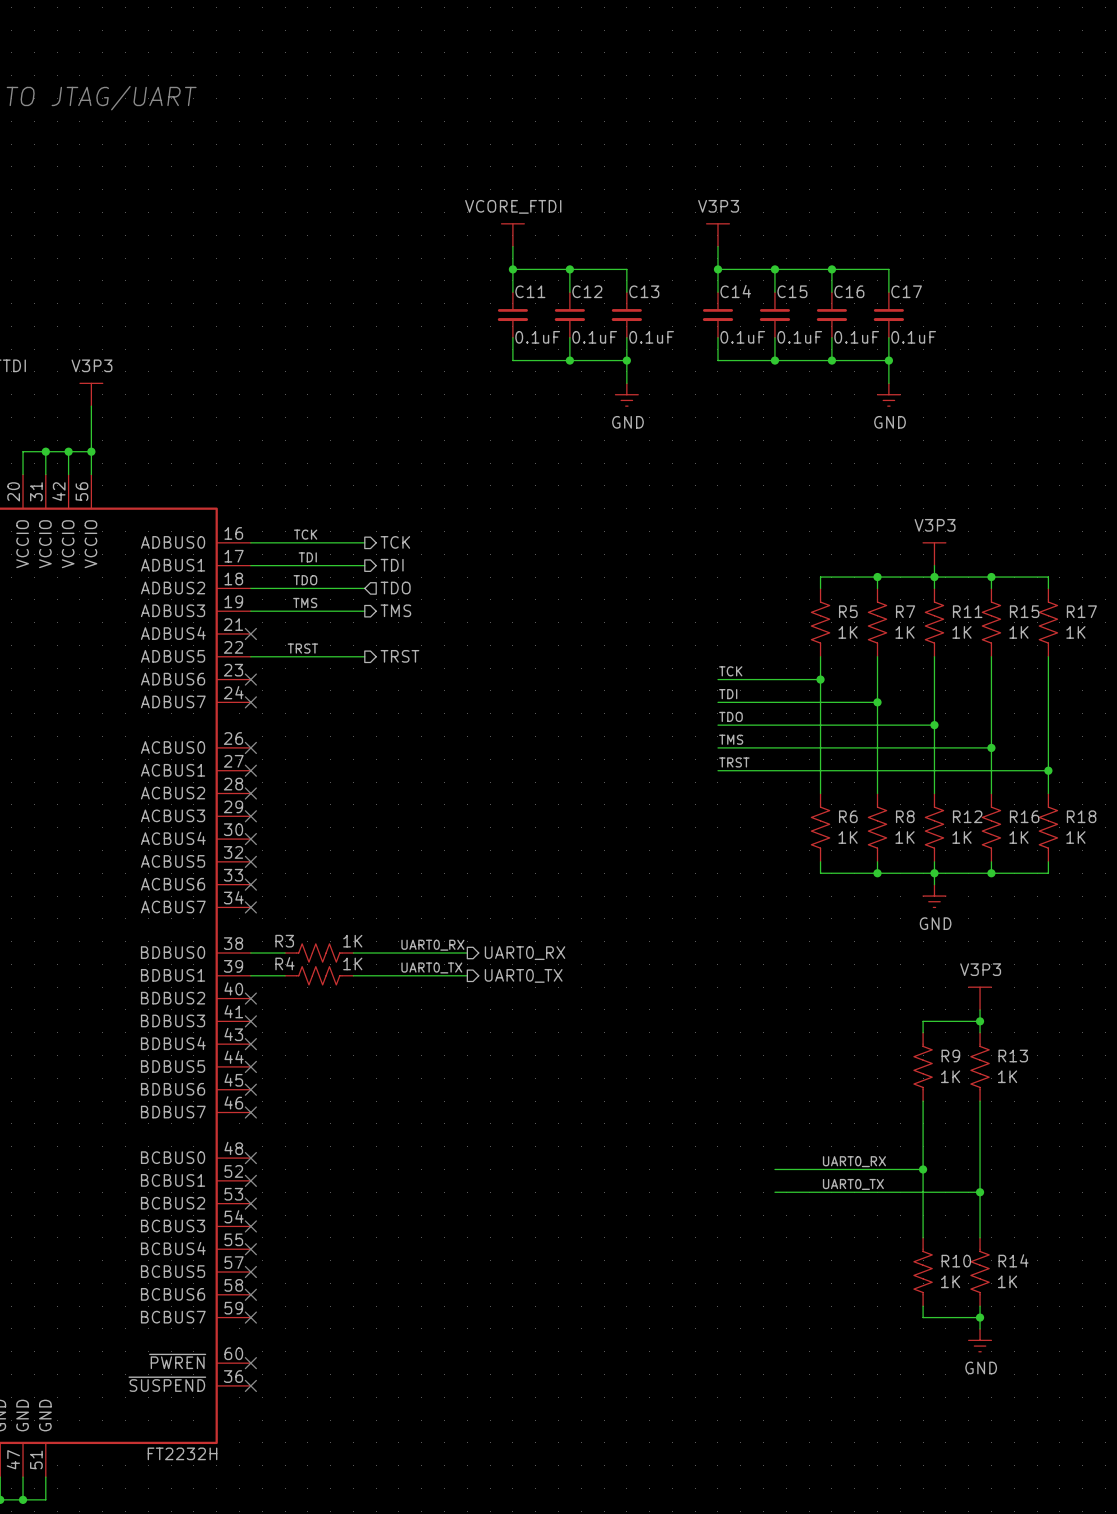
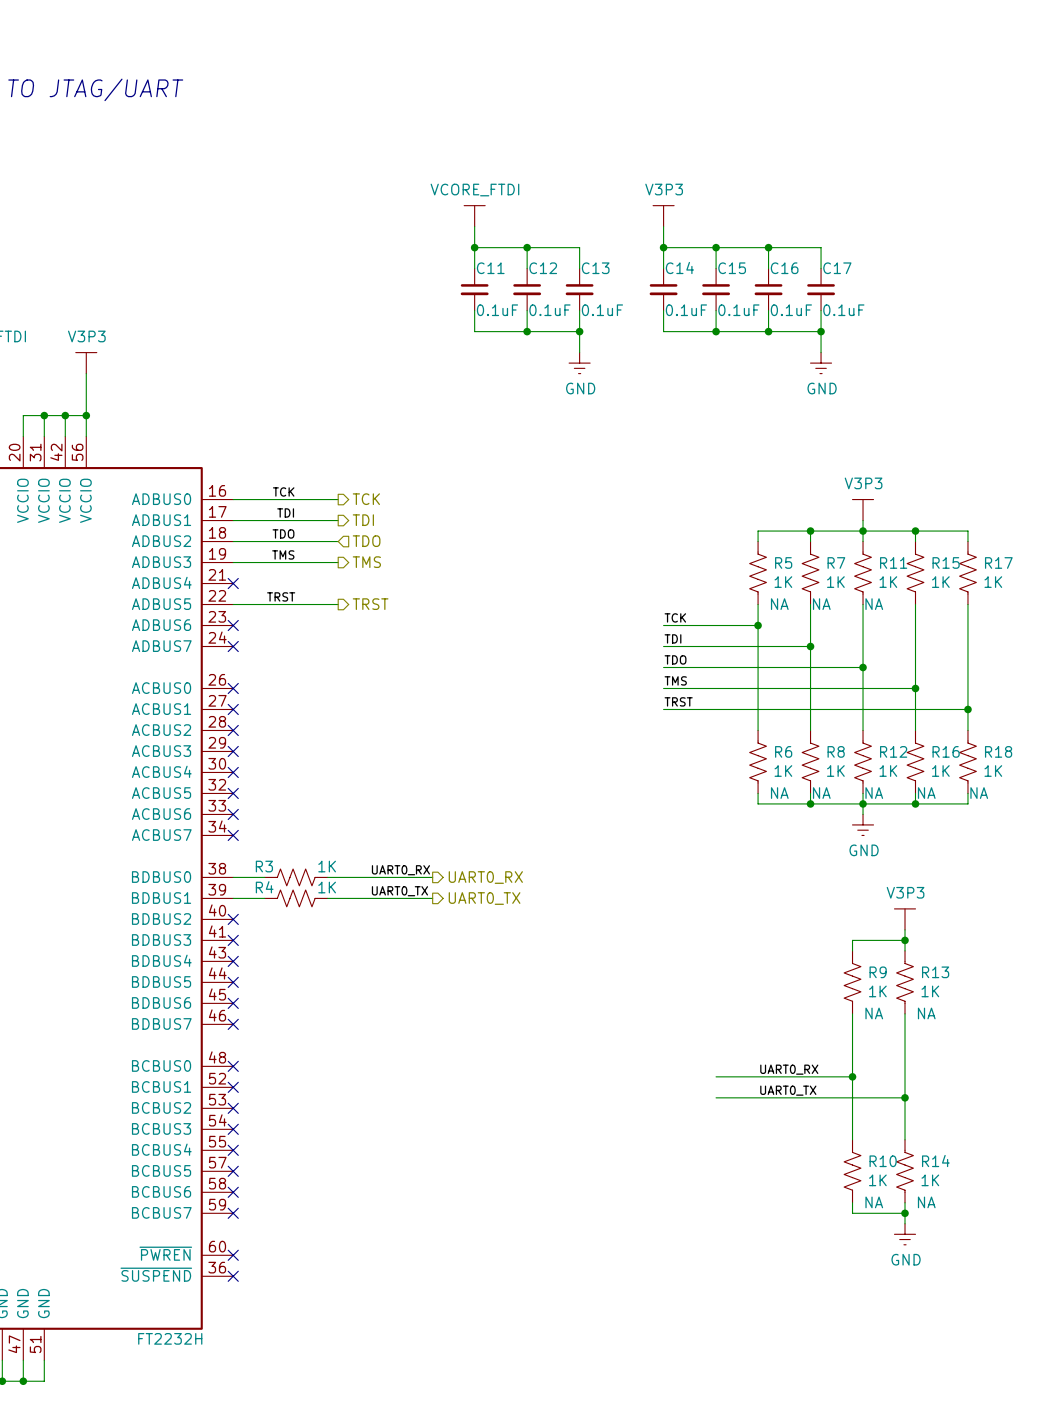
R5 text: none -> NA (779, 604)
R7 text: none -> NA (821, 604)
R11 text: none -> NA (874, 604)
R6 text: none -> NA (779, 793)
R8 text: none -> NA (821, 793)
R12 text: none -> NA (874, 793)
R16 text: none -> NA (926, 793)
R18 text: none -> NA (979, 793)
R9 text: none -> NA (874, 1013)
R13 text: none -> NA (926, 1013)
R10 text: none -> NA (874, 1202)
R14 text: none -> NA (926, 1202)

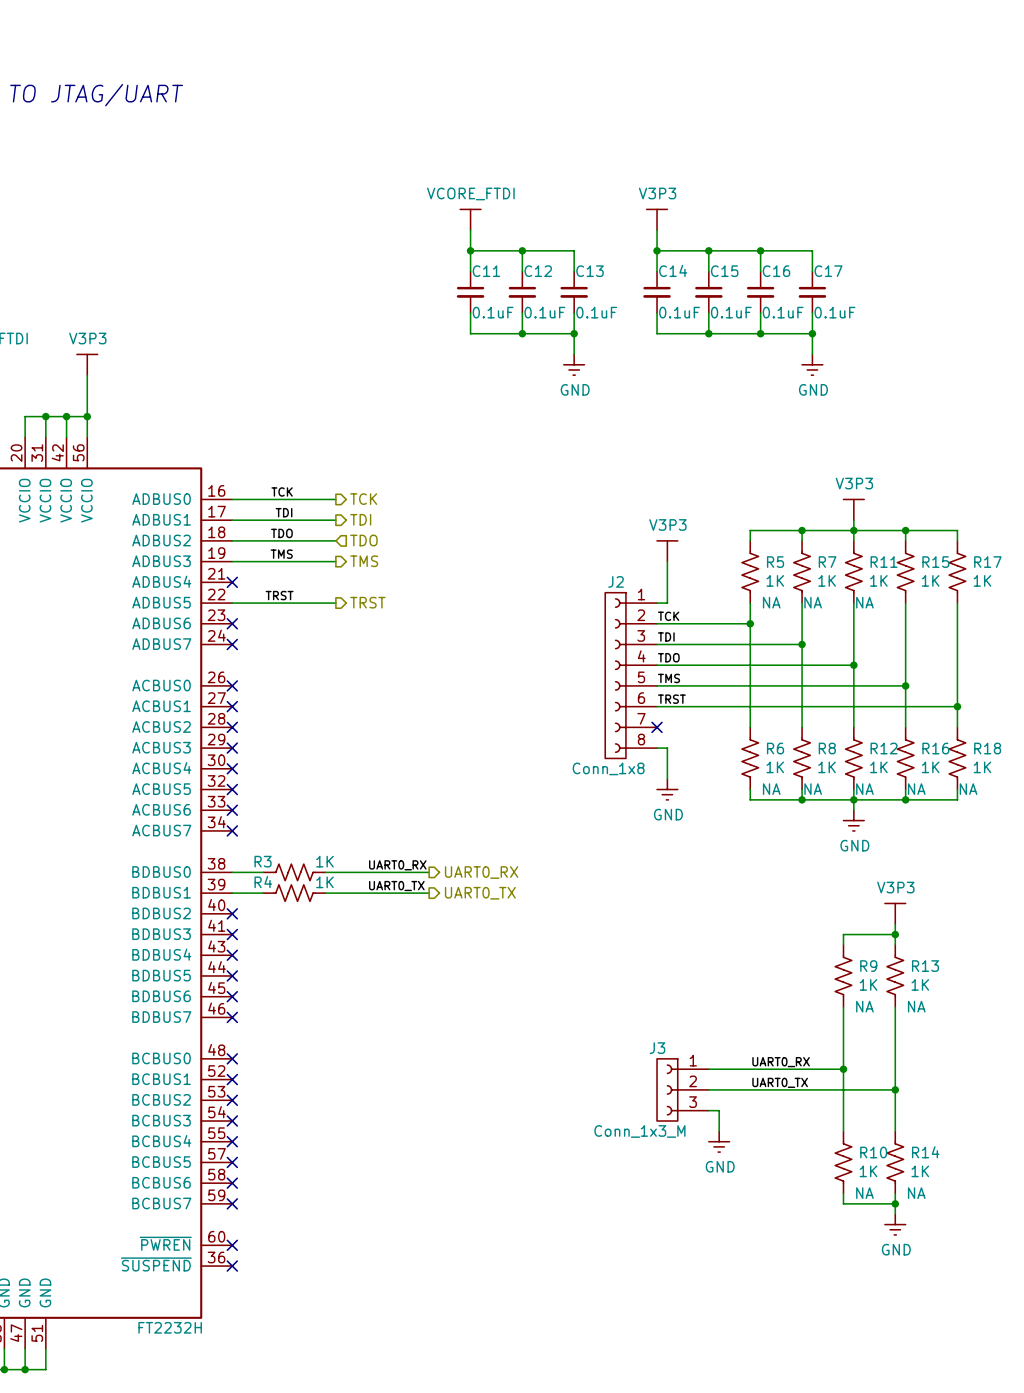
power symbol: none -> V3P3 (667, 551)
wire: none -> (667, 561) (667, 603) (657, 603)
J2: none -> Conn_1x8 (631, 675)
no-connect mark: none -> (657, 727)
wire: none -> (657, 748) (667, 748) (667, 779)
power symbol: none -> GND (667, 789)
J3: none -> Conn_1x3_M (682, 1089)
wire: none -> (708, 1110) (719, 1110) (719, 1131)
power symbol: none -> GND (719, 1141)

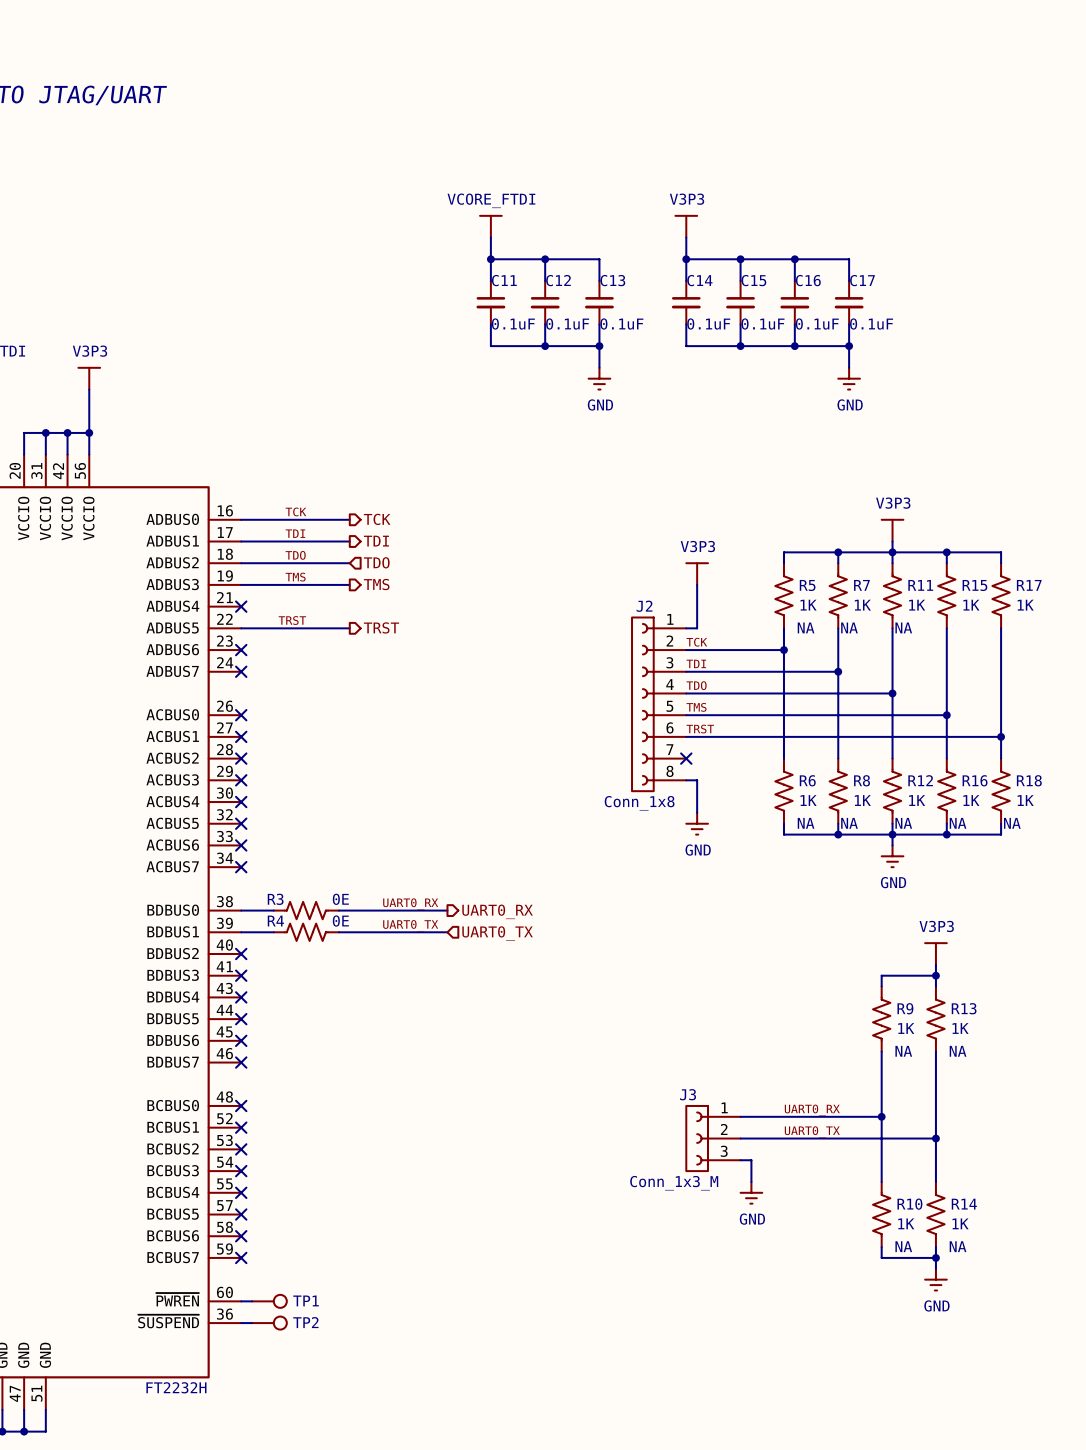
R3 value: 1K (324, 861) -> 0E (340, 899)
R4 value: 1K (324, 882) -> 0E (340, 921)
hierarchical label shape: output (480, 893) -> input (497, 933)
wire: none -> (241, 1301) (252, 1301)
no-connect mark: (232, 1245) -> none
TP1: none -> (269, 1301)
wire: none -> (241, 1323) (252, 1323)
no-connect mark: (232, 1266) -> none
TP2: none -> (269, 1323)

